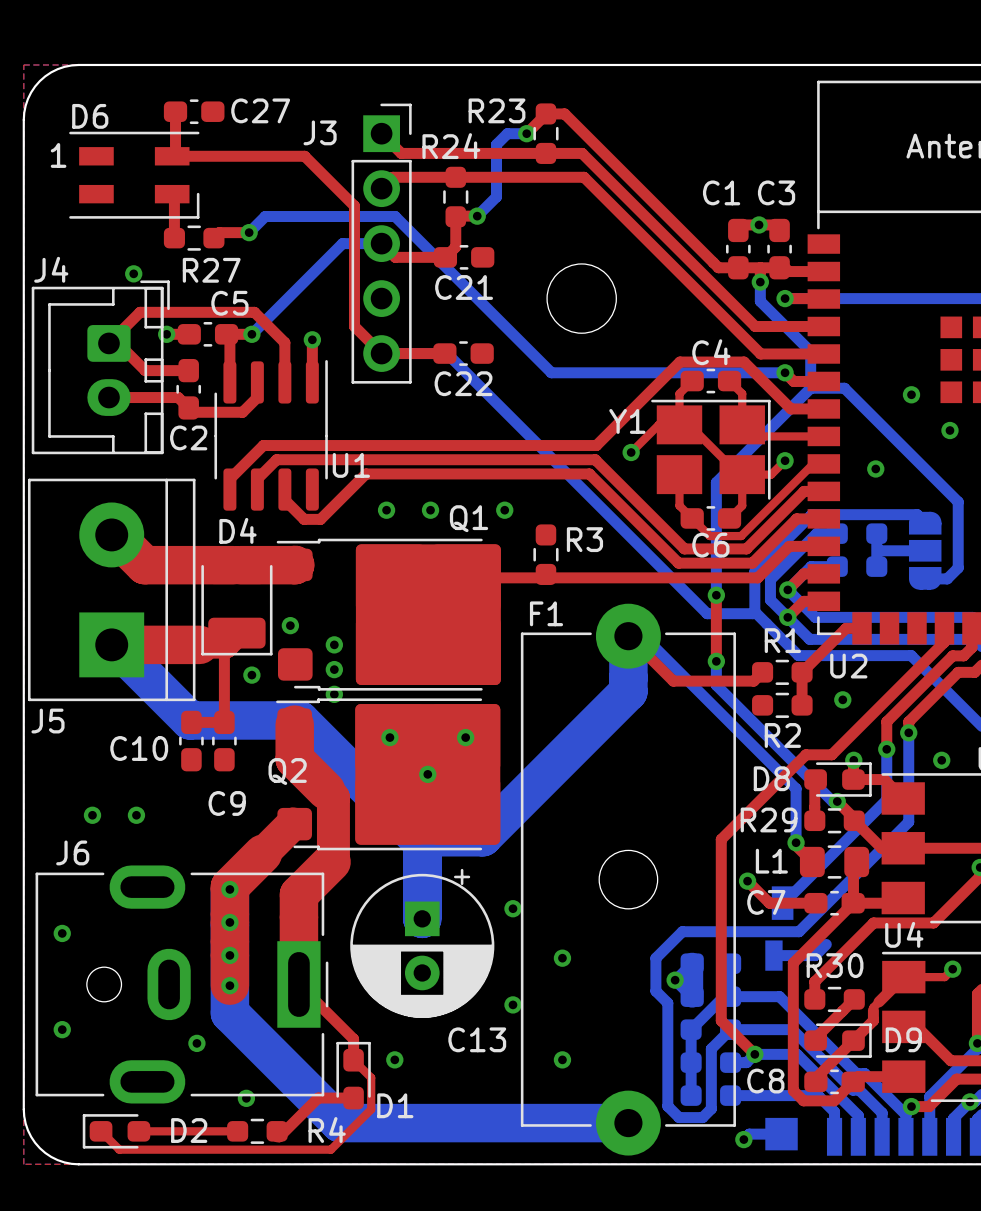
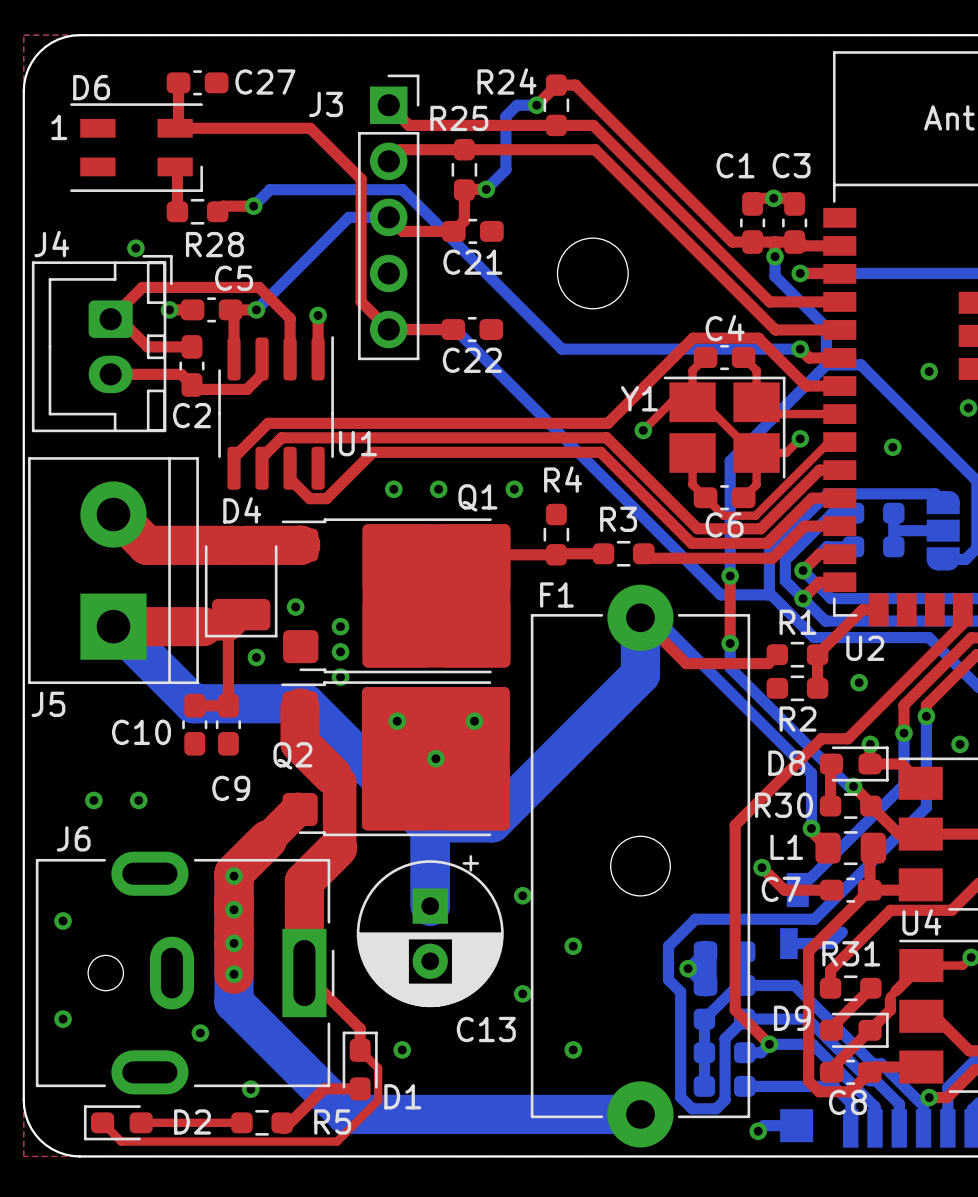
R23 name: R23 (497, 110) -> R24 (506, 81)
R24 name: R24 (451, 146) -> R25 (459, 118)
R27 name: R27 (211, 270) -> R28 (214, 244)
R3 name: R3 (584, 539) -> R4 (563, 479)
R3: none -> (623, 553)
top track: (466, 577) (636, 577) -> (475, 558) (478, 554) (603, 553)
R29 name: R29 (769, 819) -> R30 (783, 805)
R30 name: R30 (835, 965) -> R31 (851, 953)
D9 name position: D9 (903, 1039) -> D9 (792, 1018)
C8 name position: C8 (765, 1081) -> C8 (847, 1102)
R4 name: R4 (327, 1130) -> R5 (332, 1122)

